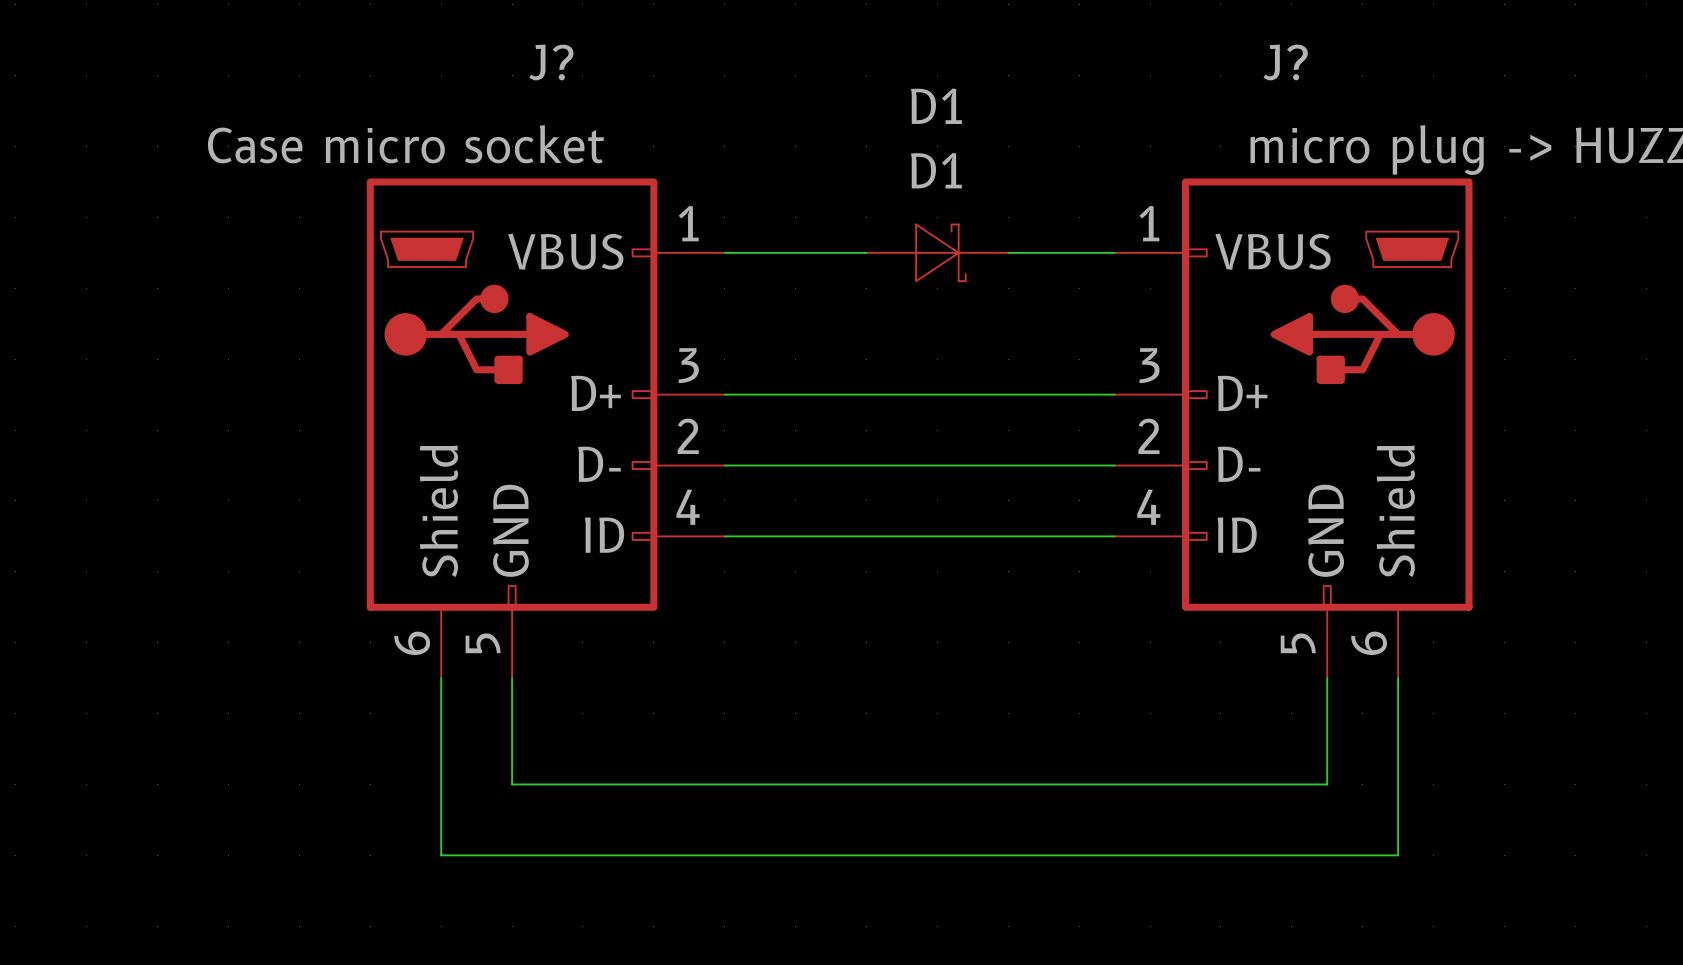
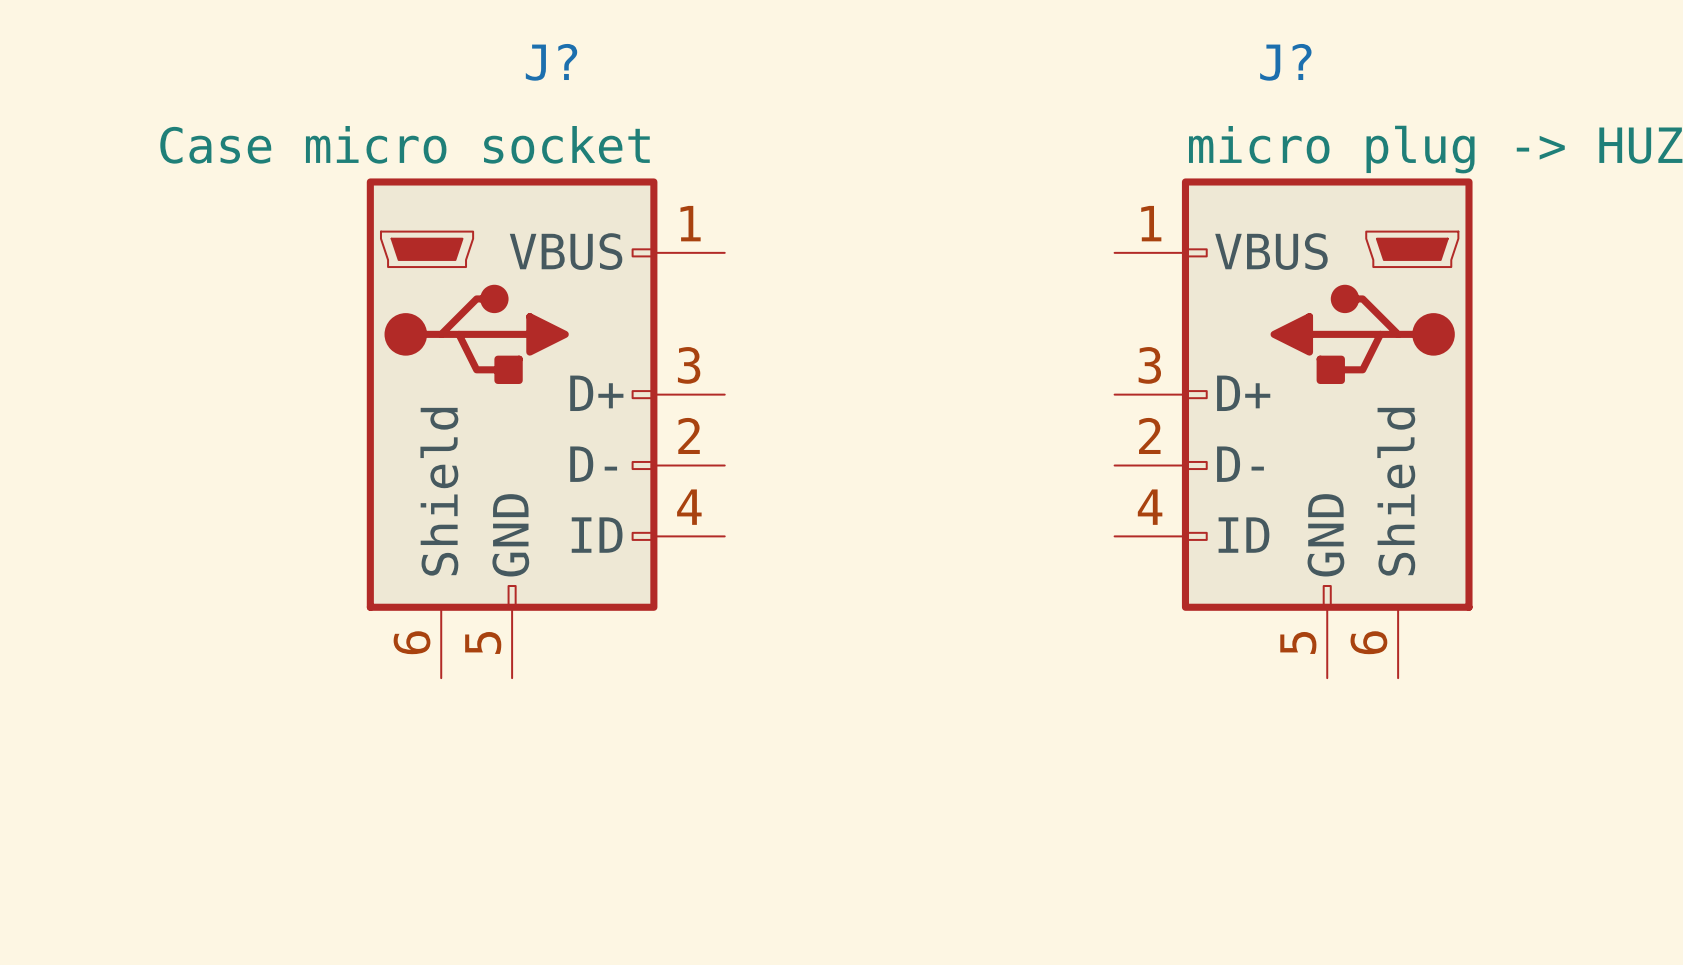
wire: (724, 252) (866, 252) -> none
D1: D1 (937, 252) -> none
wire: (1008, 252) (1114, 252) -> none
wire: (724, 394) (1114, 394) -> none
wire: (724, 465) (1114, 465) -> none
wire: (724, 536) (1114, 536) -> none
wire: (441, 678) (441, 855) (1398, 855) (1398, 678) -> none
wire: (512, 678) (512, 784) (1327, 784) (1327, 678) -> none

